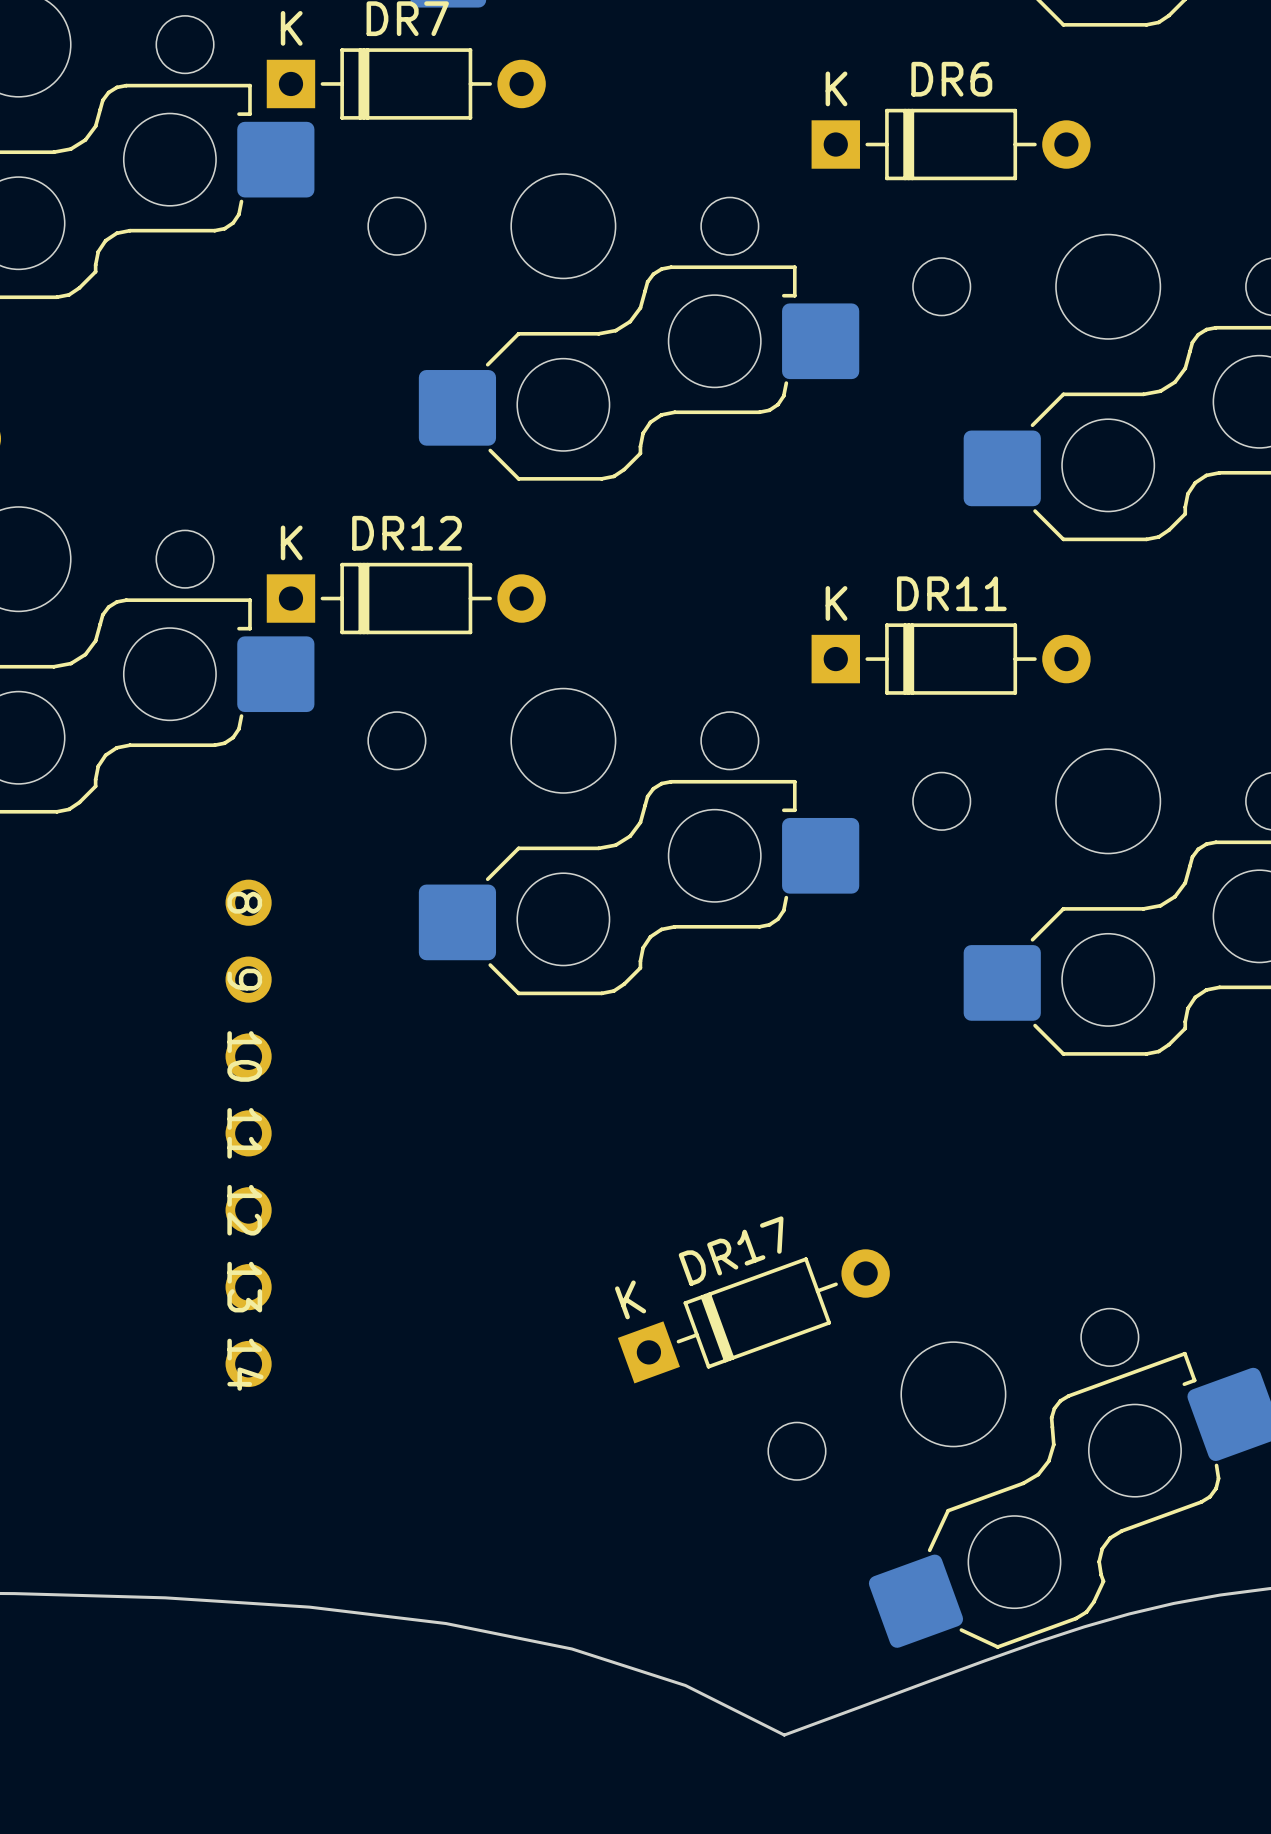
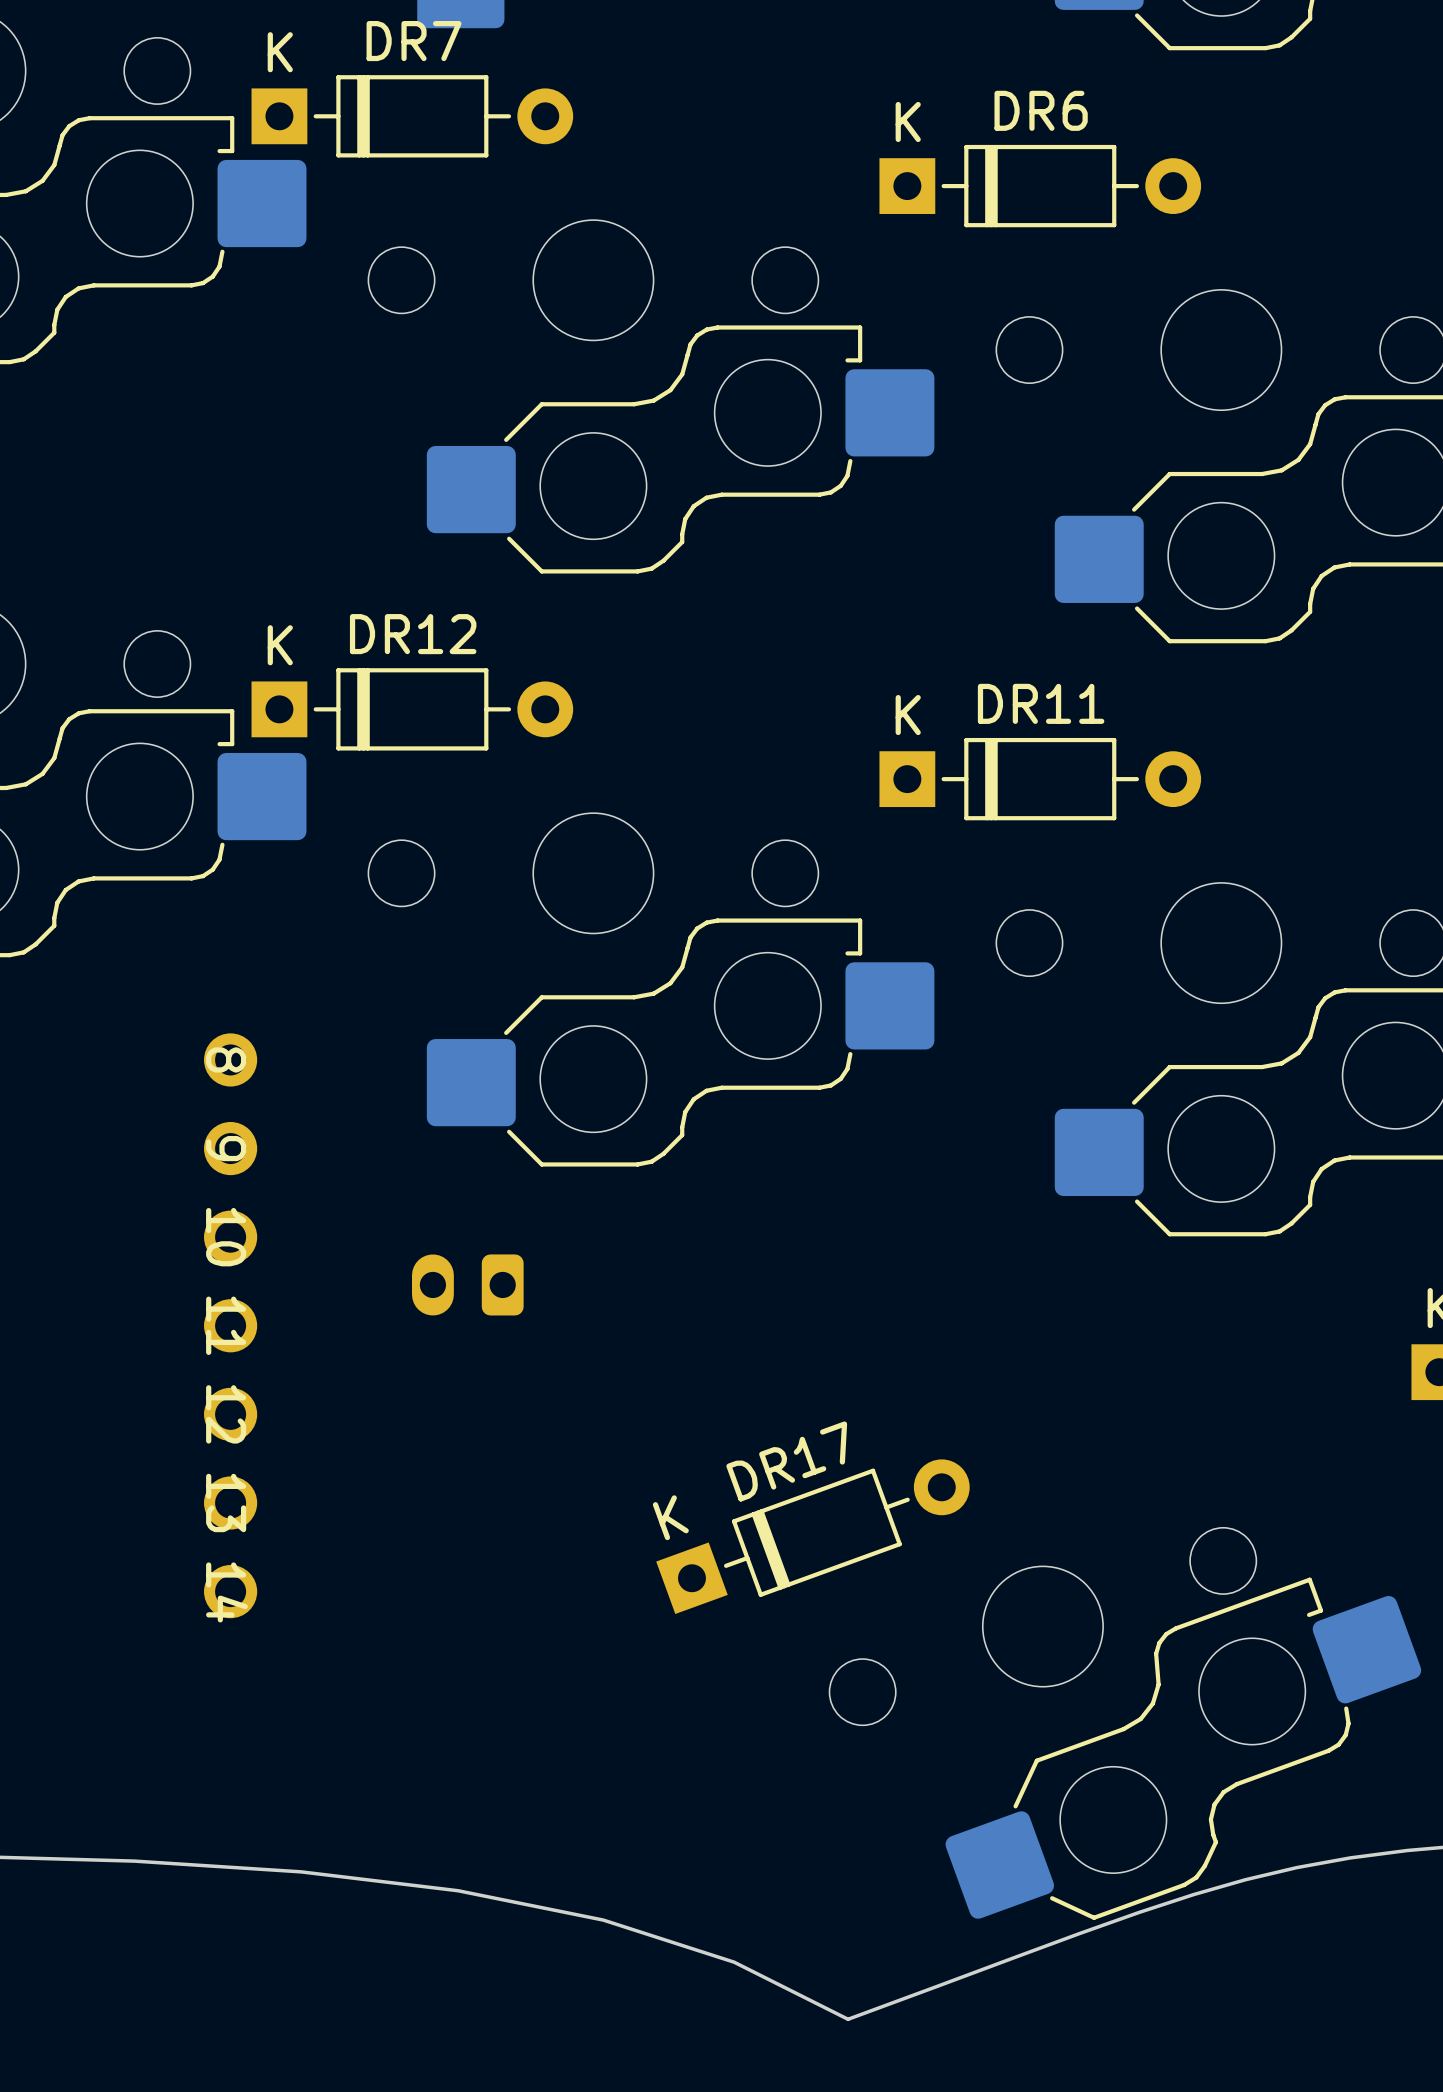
part: none -> (467, 1284)

